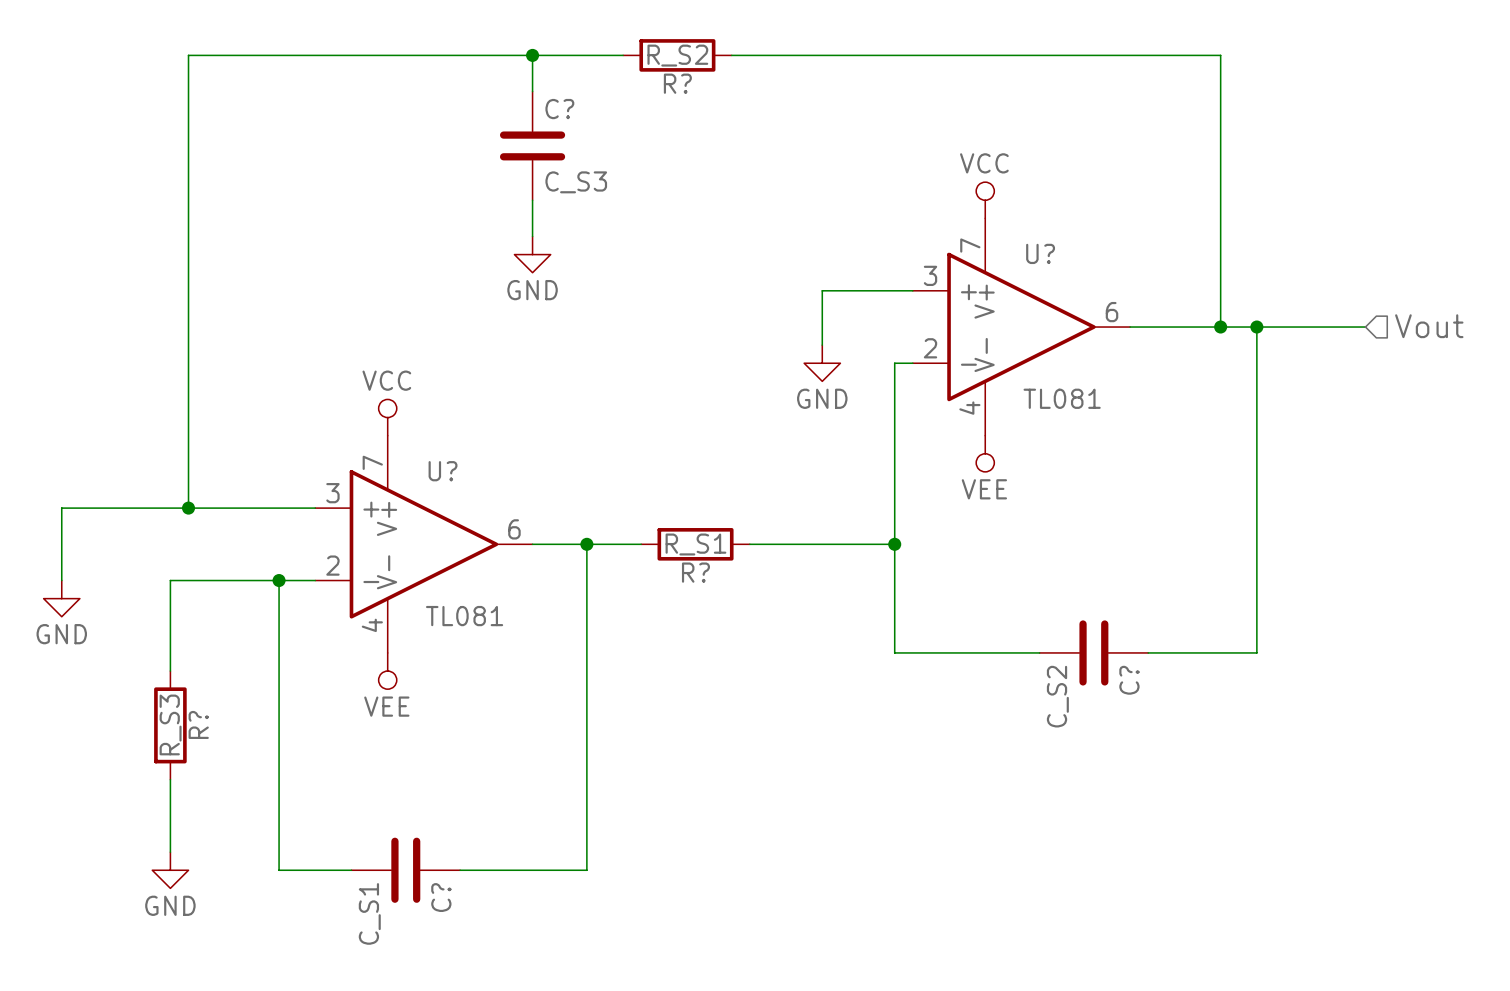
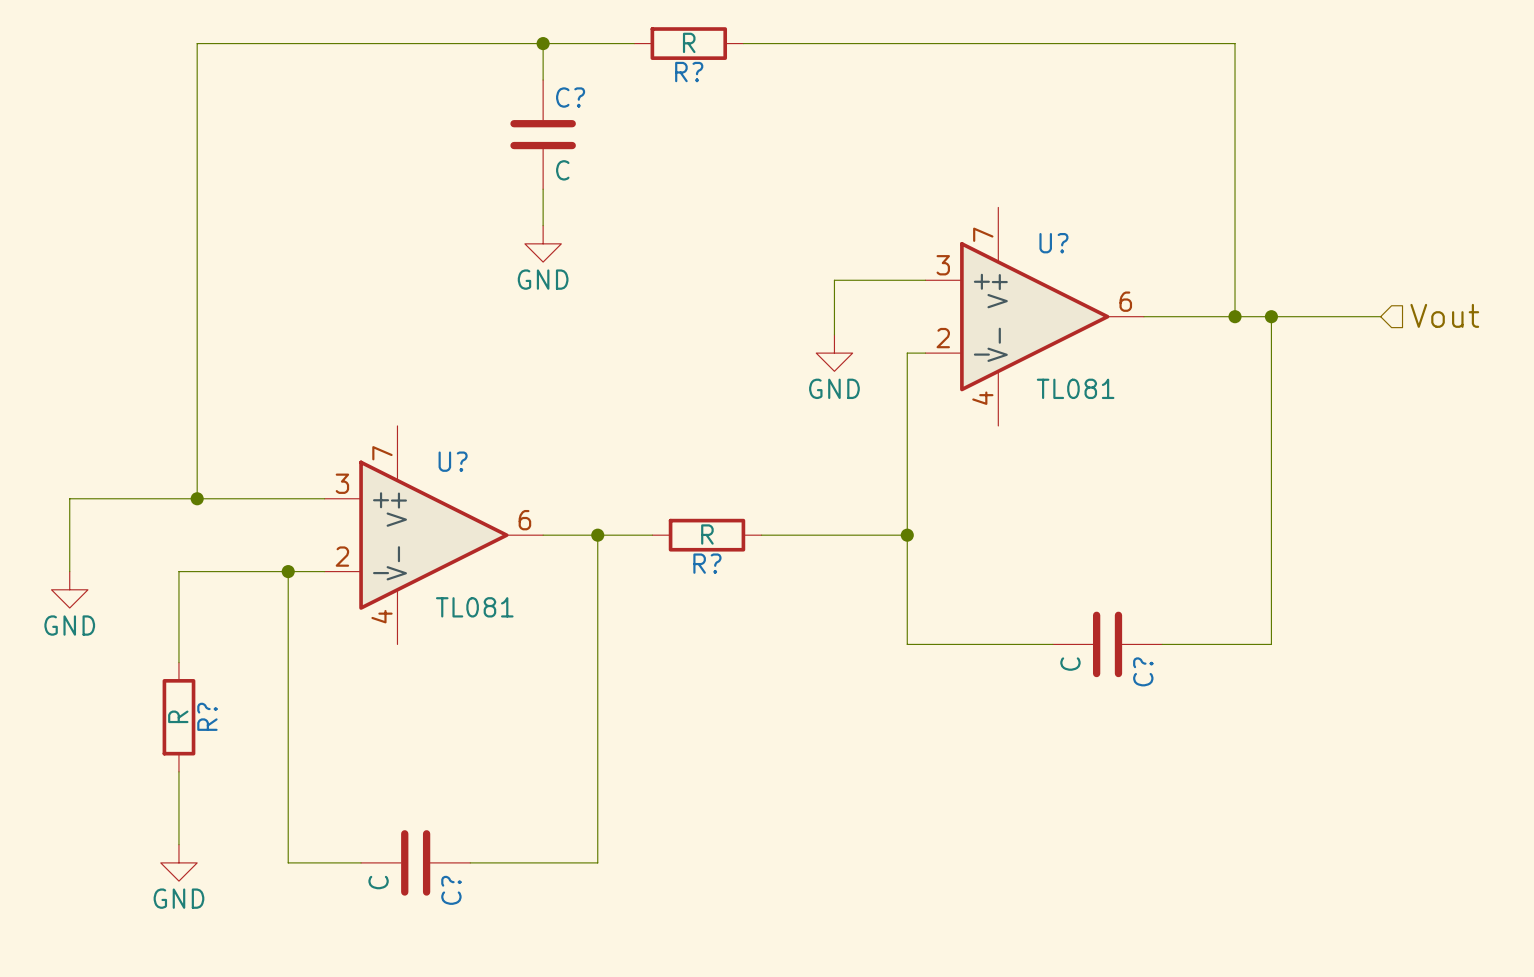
R? value: R_S2 (677, 55) -> R (689, 42)
C? value: C_S3 (576, 182) -> C (562, 170)
power symbol: VCC (985, 200) -> none
power symbol: VCC (387, 417) -> none
power symbol: VEE (985, 453) -> none
R? value: R_S1 (695, 544) -> R (707, 534)
power symbol: VEE (387, 671) -> none
C? value: C_S2 (1057, 696) -> C (1070, 664)
R? value: R_S3 (170, 724) -> R (178, 716)
C? value: C_S1 (369, 913) -> C (378, 882)

